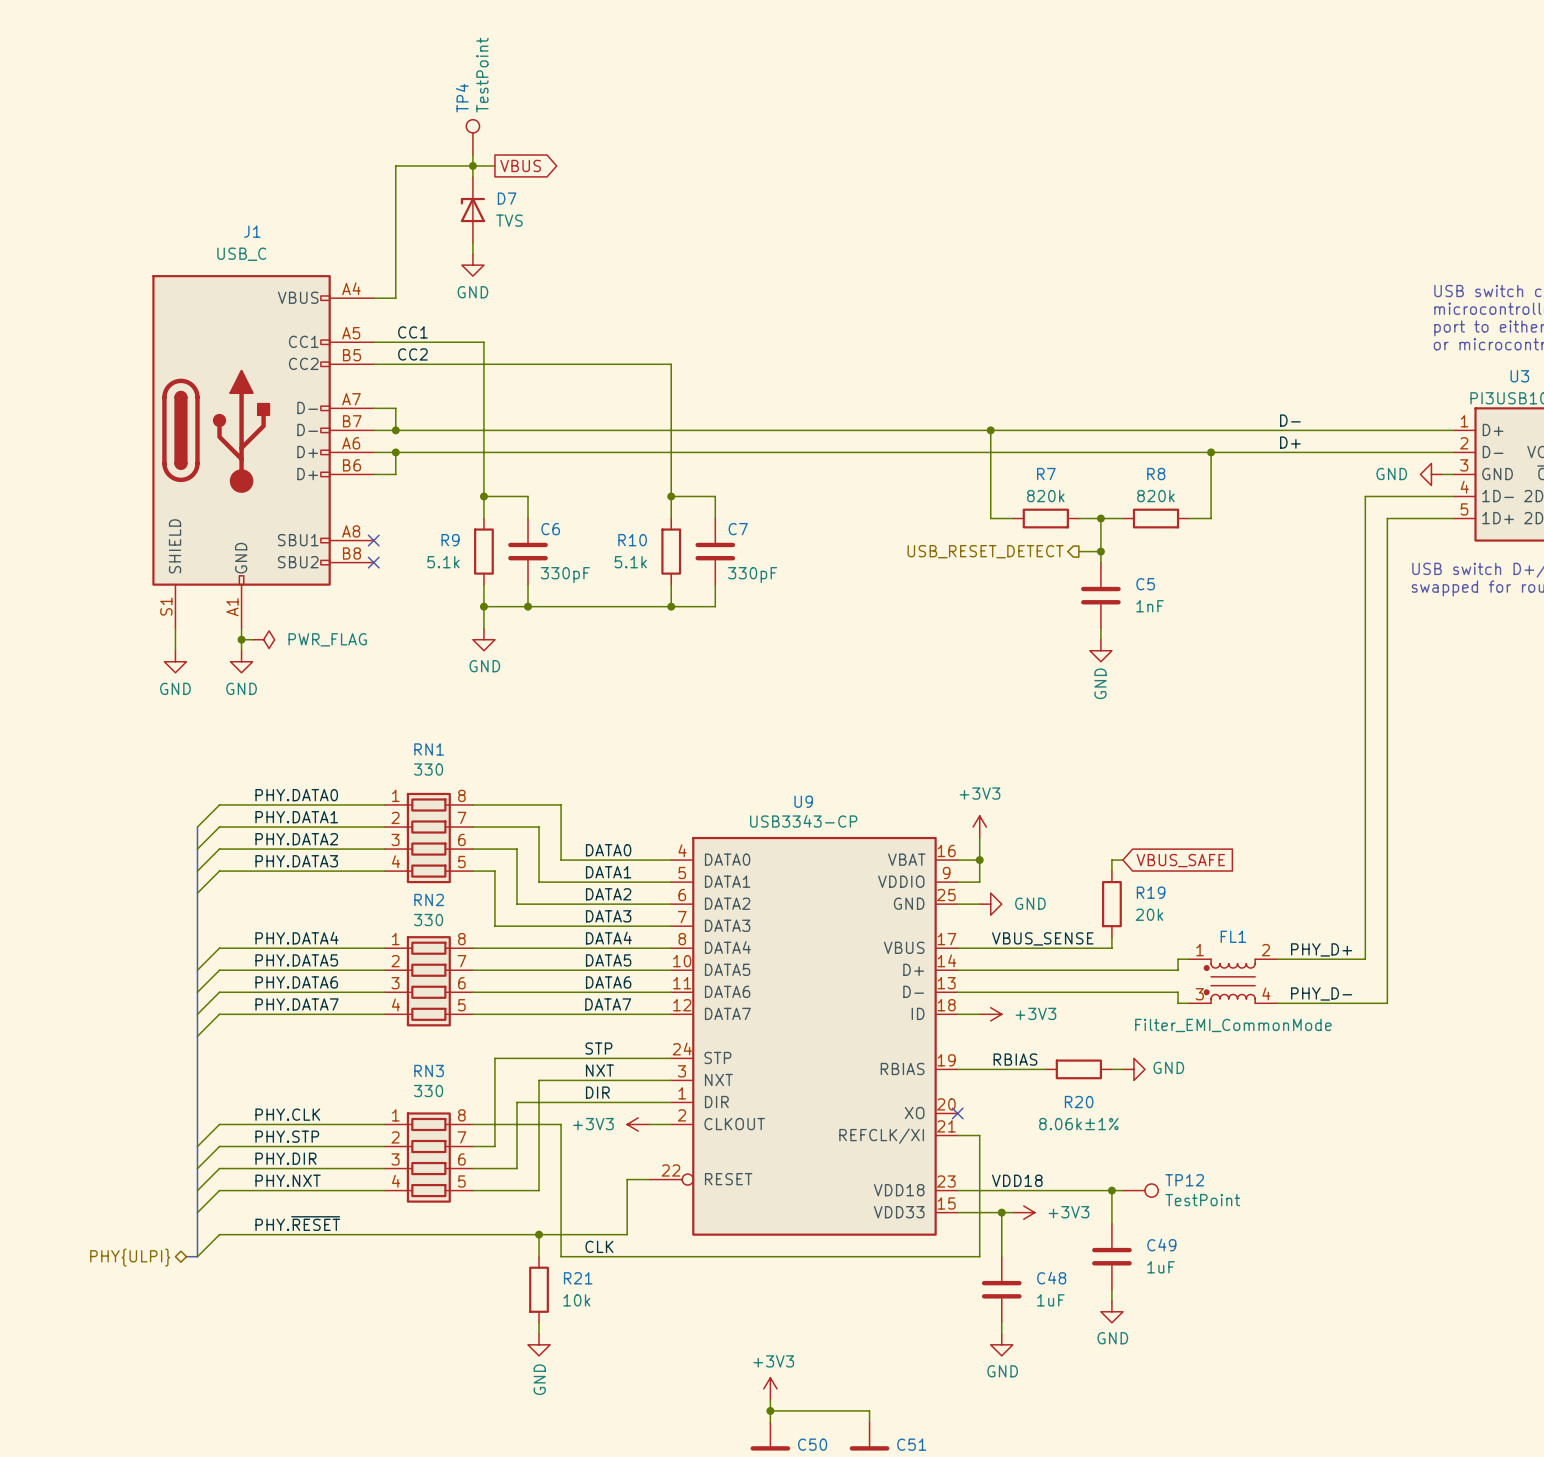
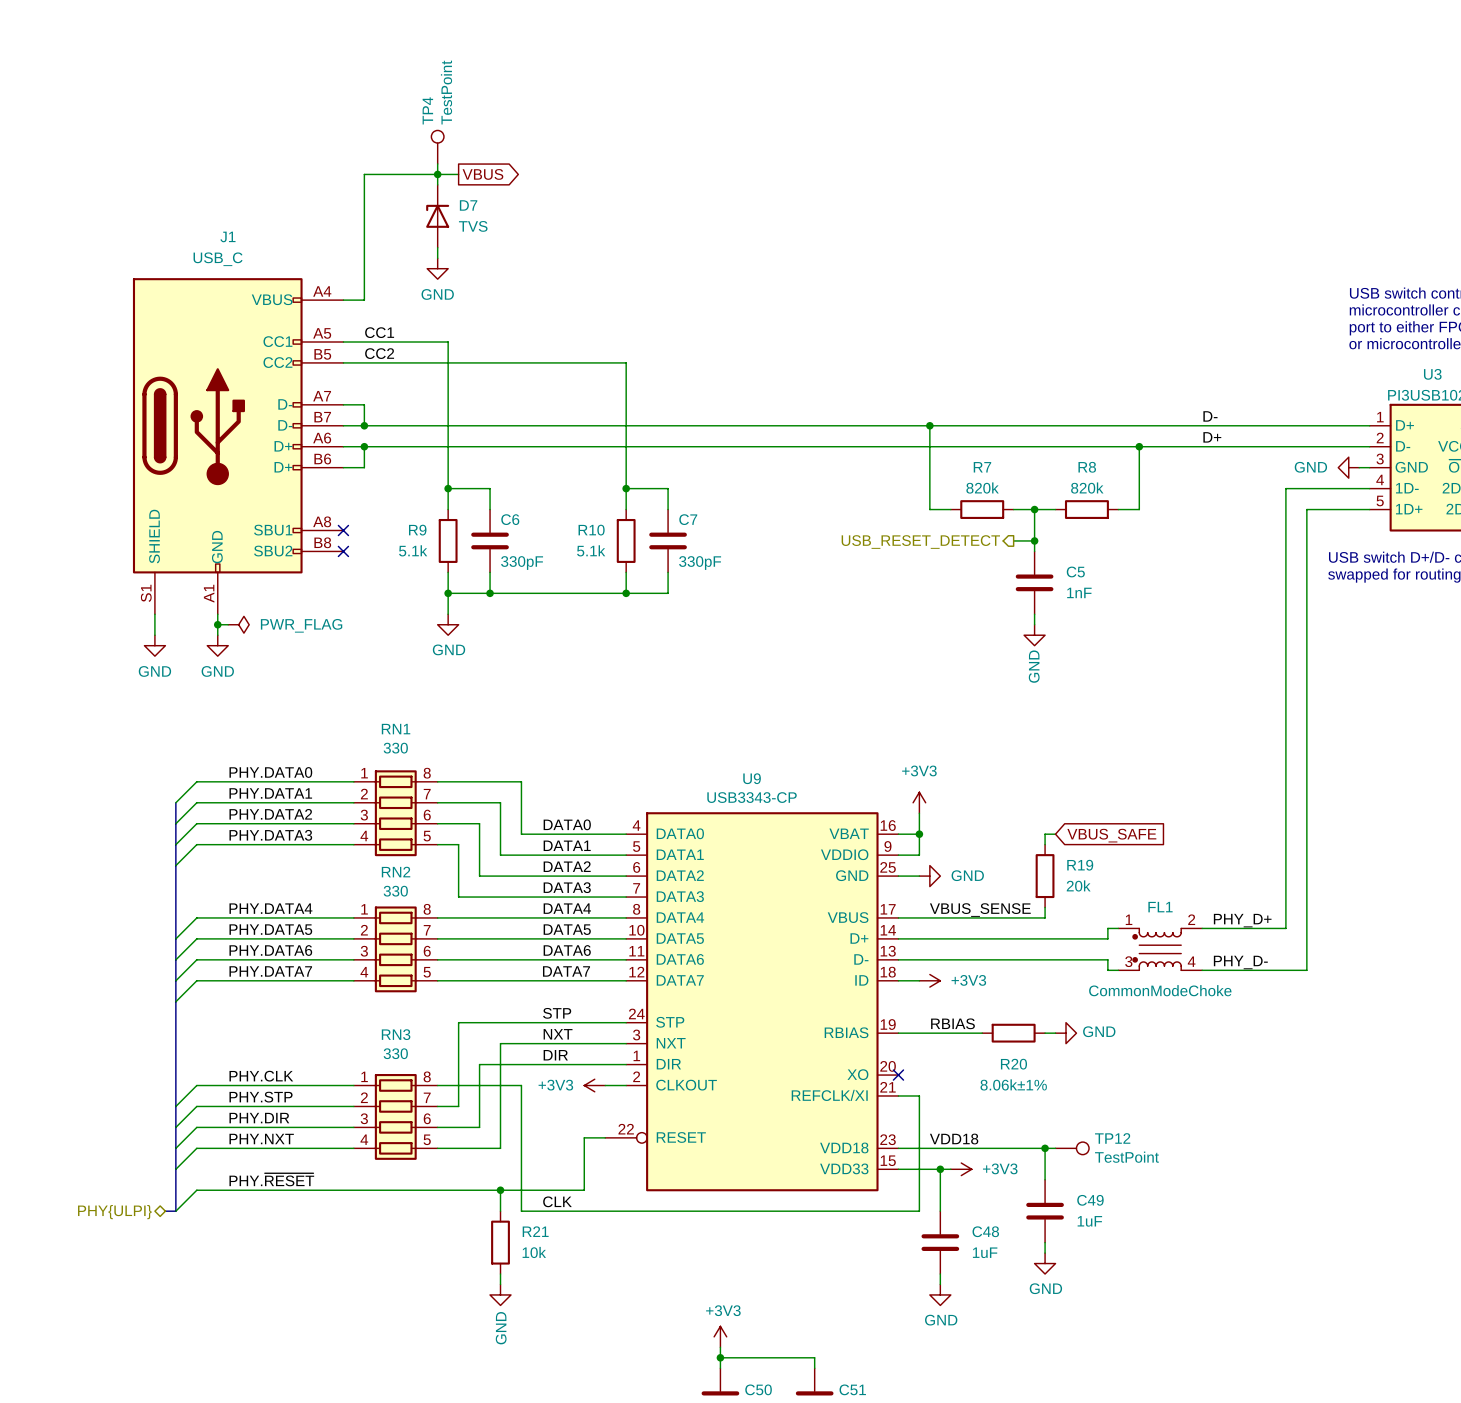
FL1 value: Filter_EMI_CommonMode (1233, 1025) -> CommonModeChoke (1160, 990)

